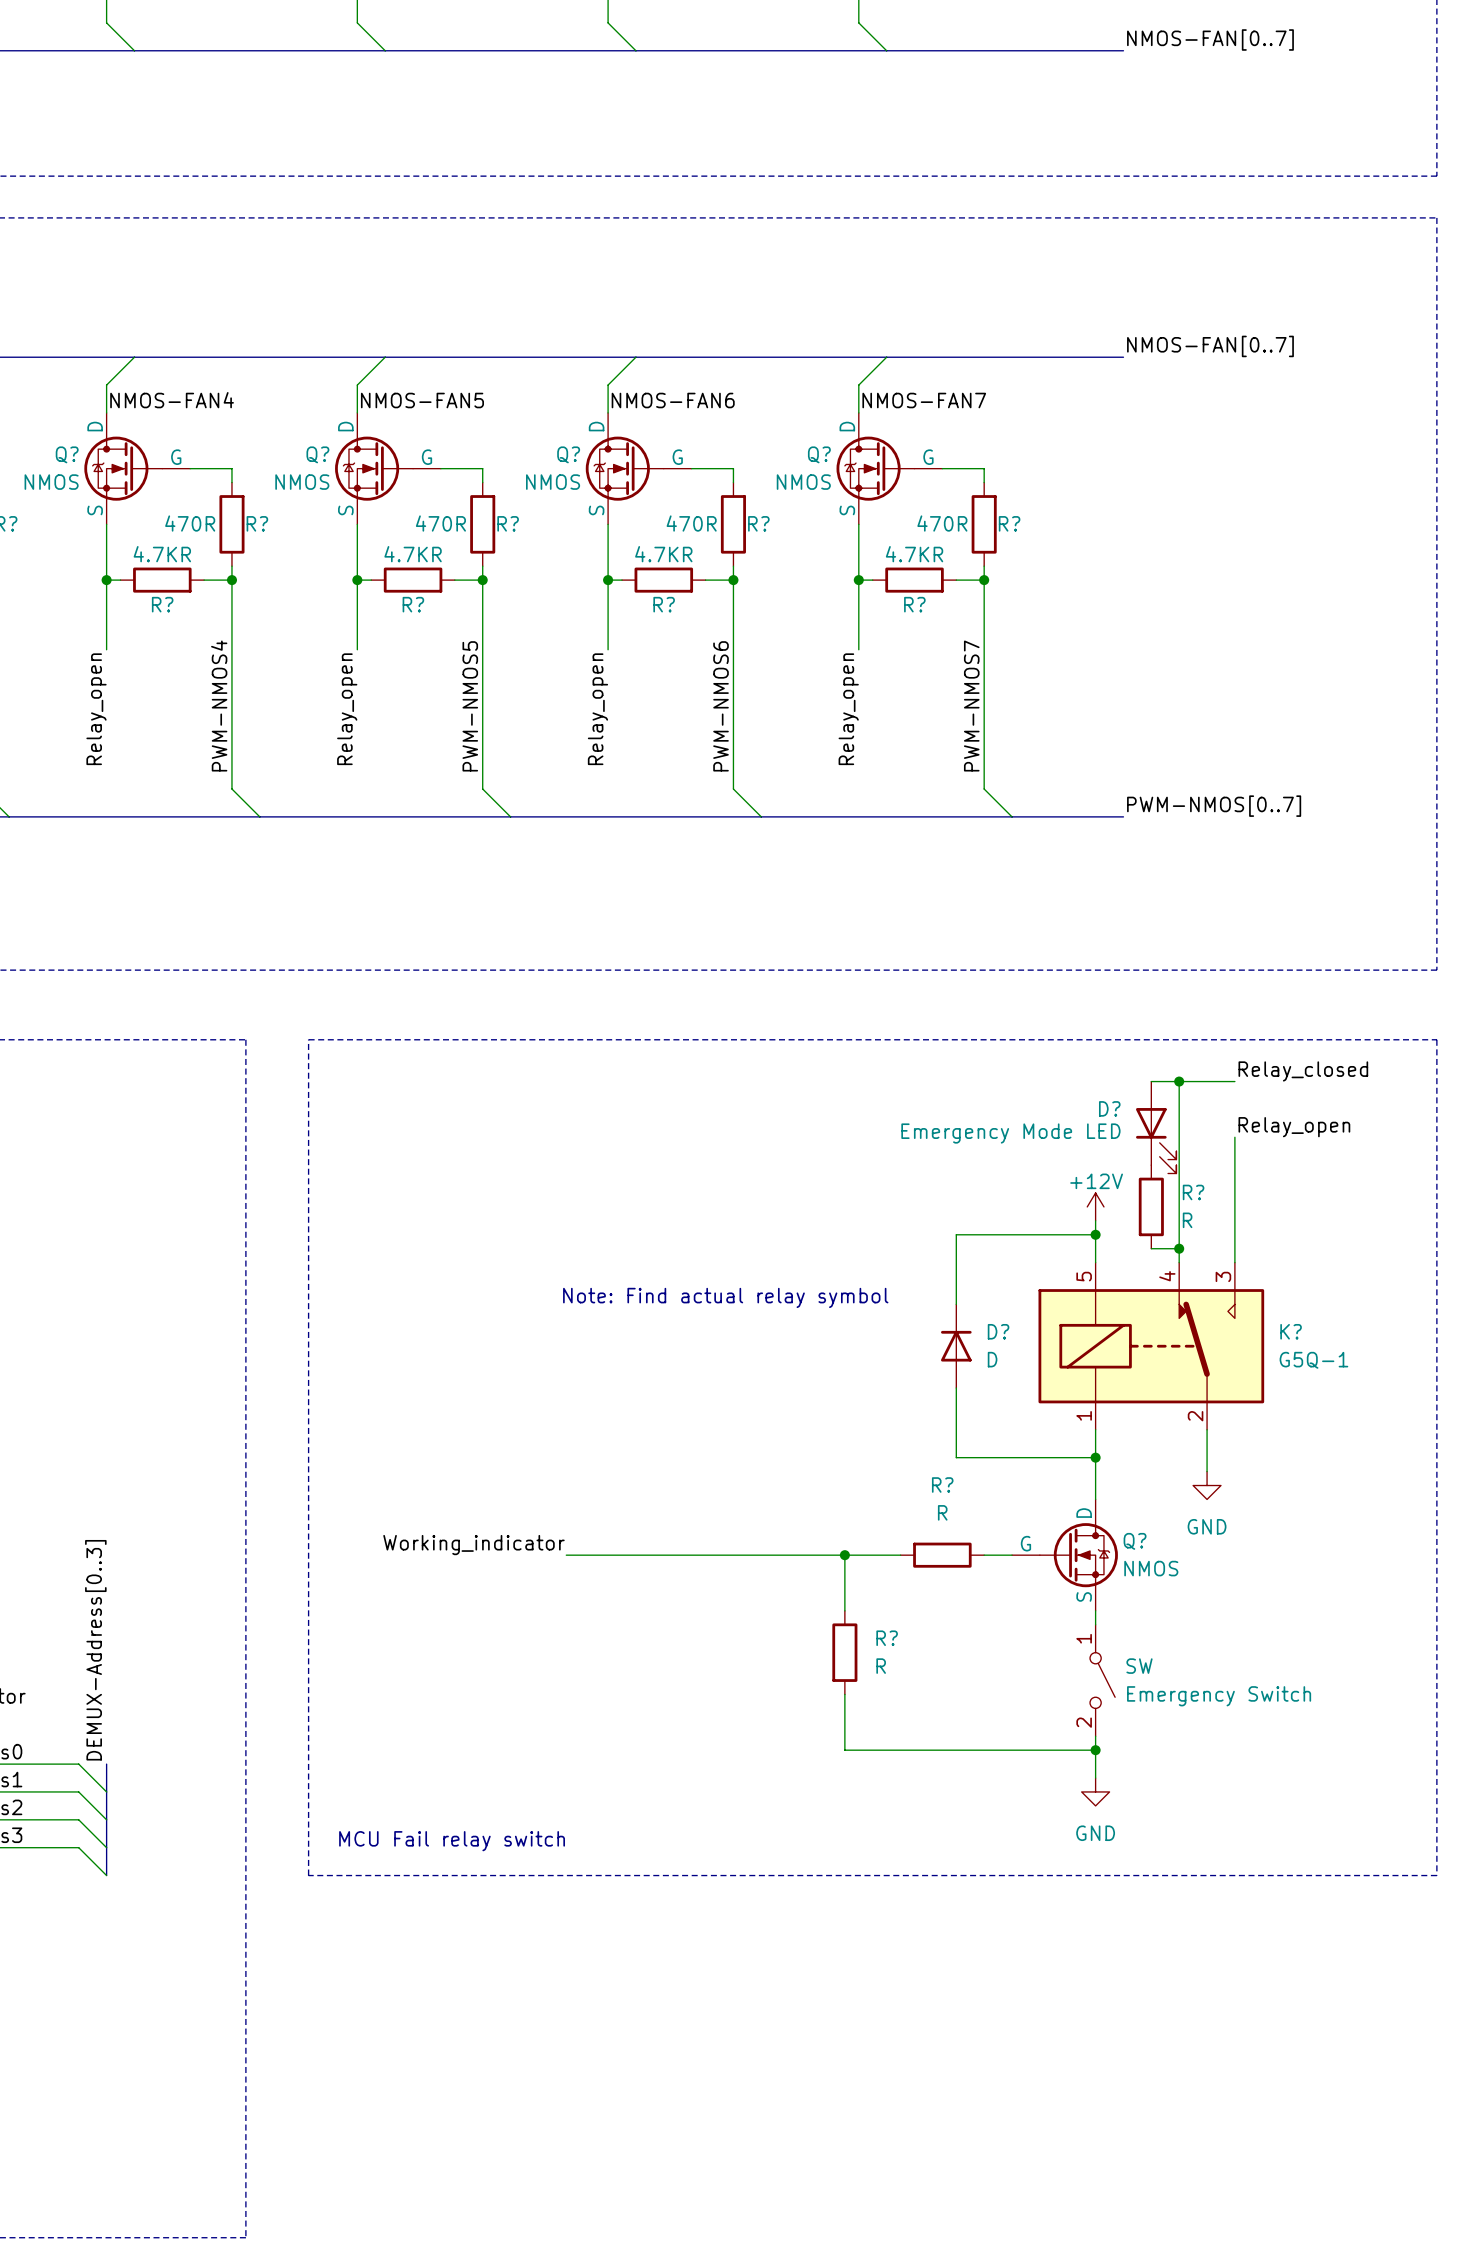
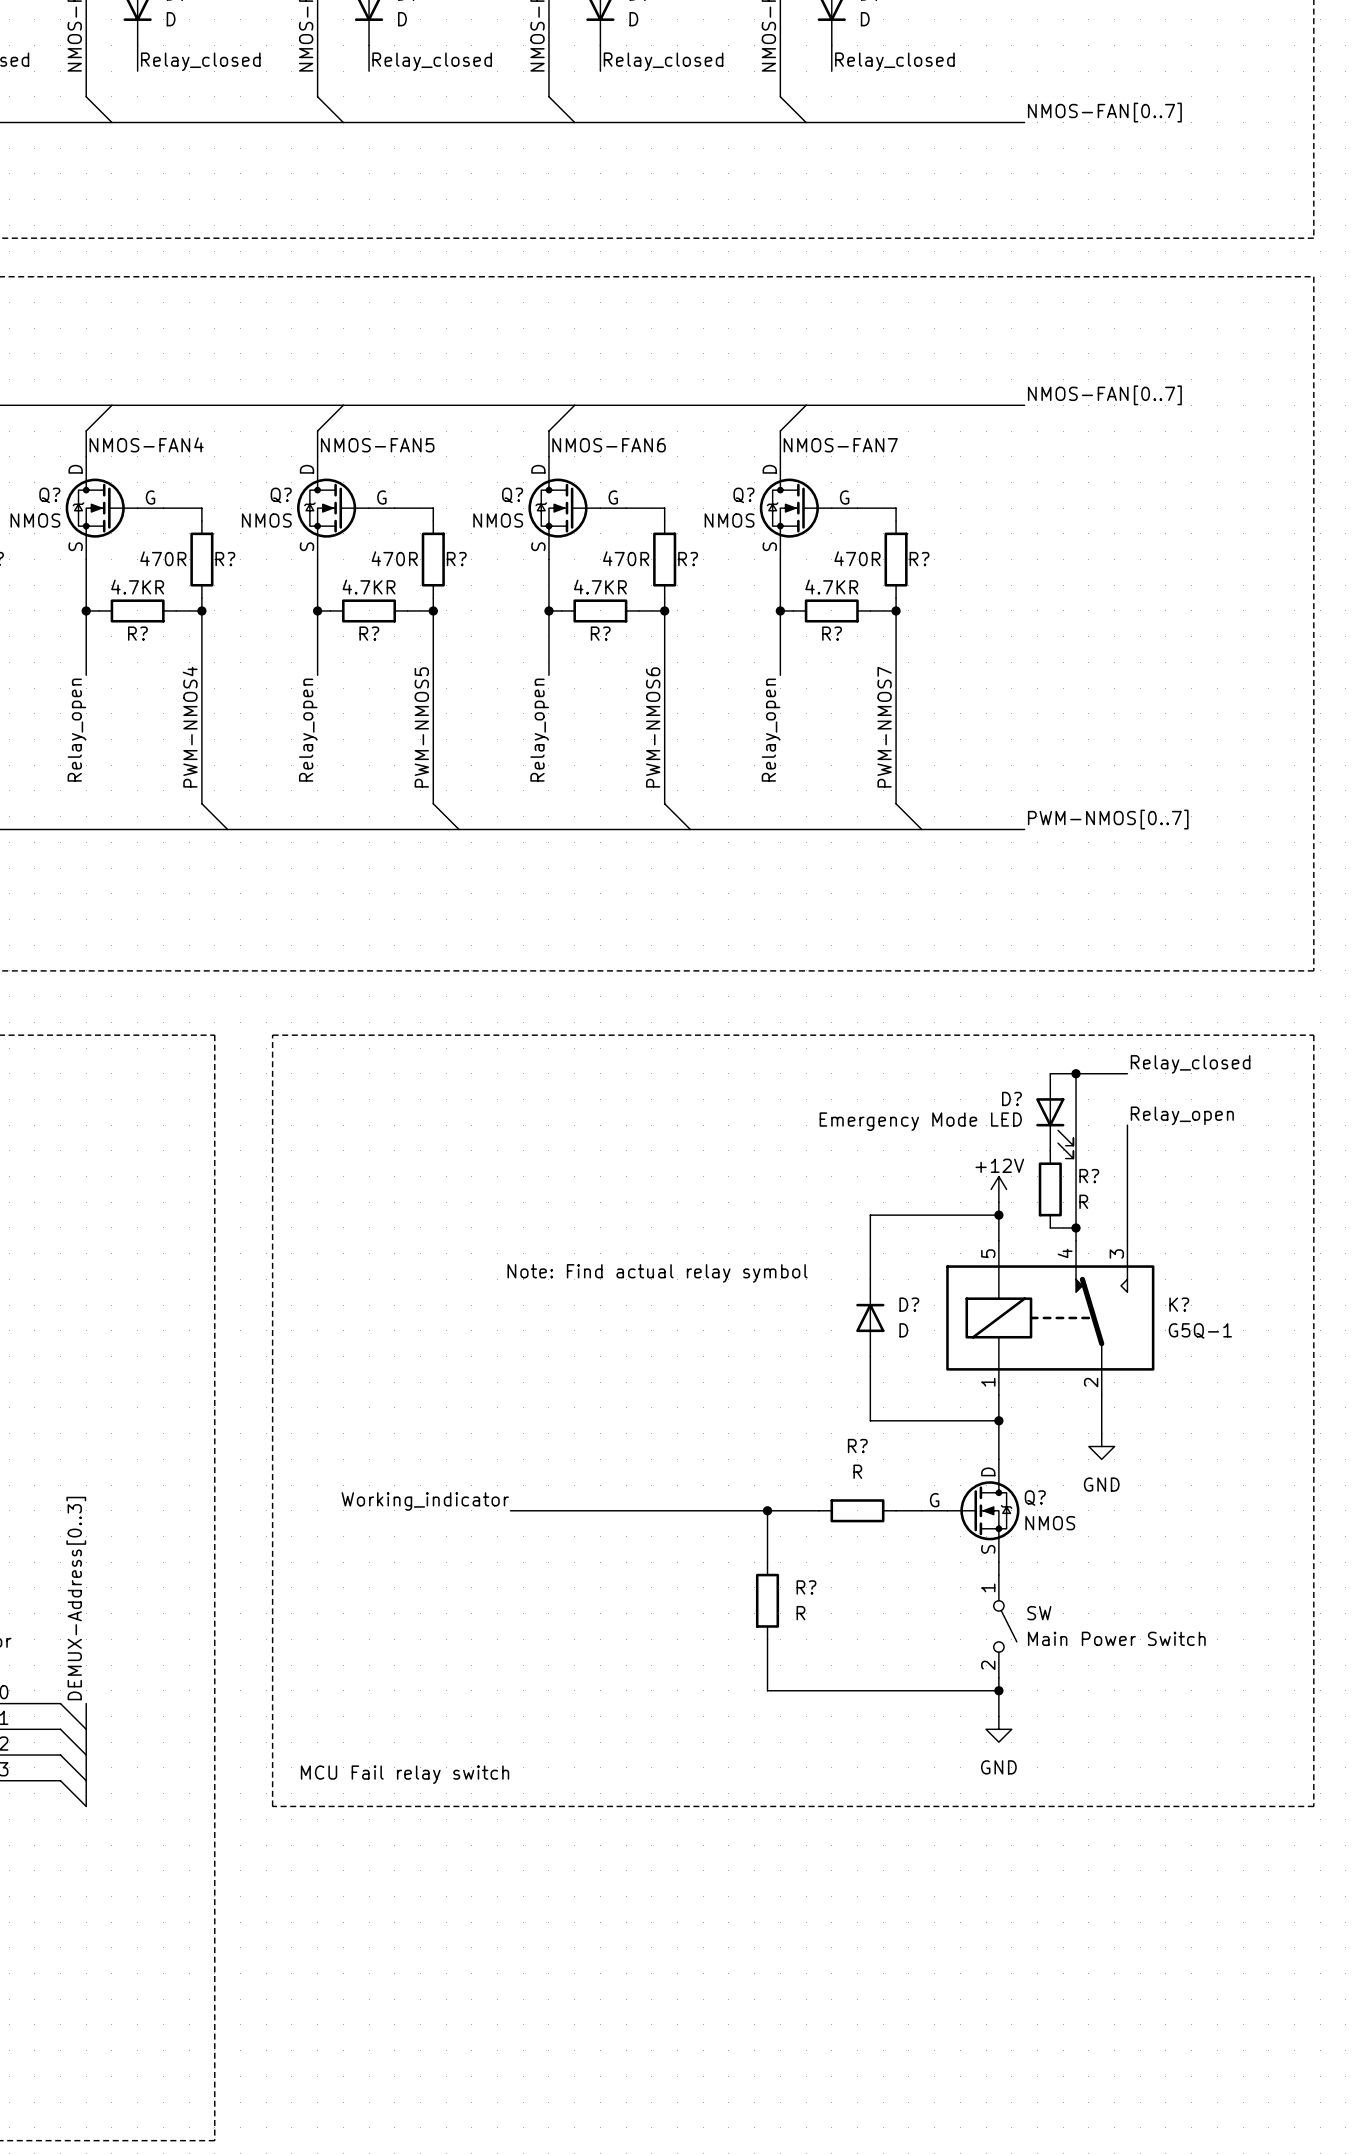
SW value: Emergency Switch (1219, 1696) -> Main Power Switch (1116, 1638)

